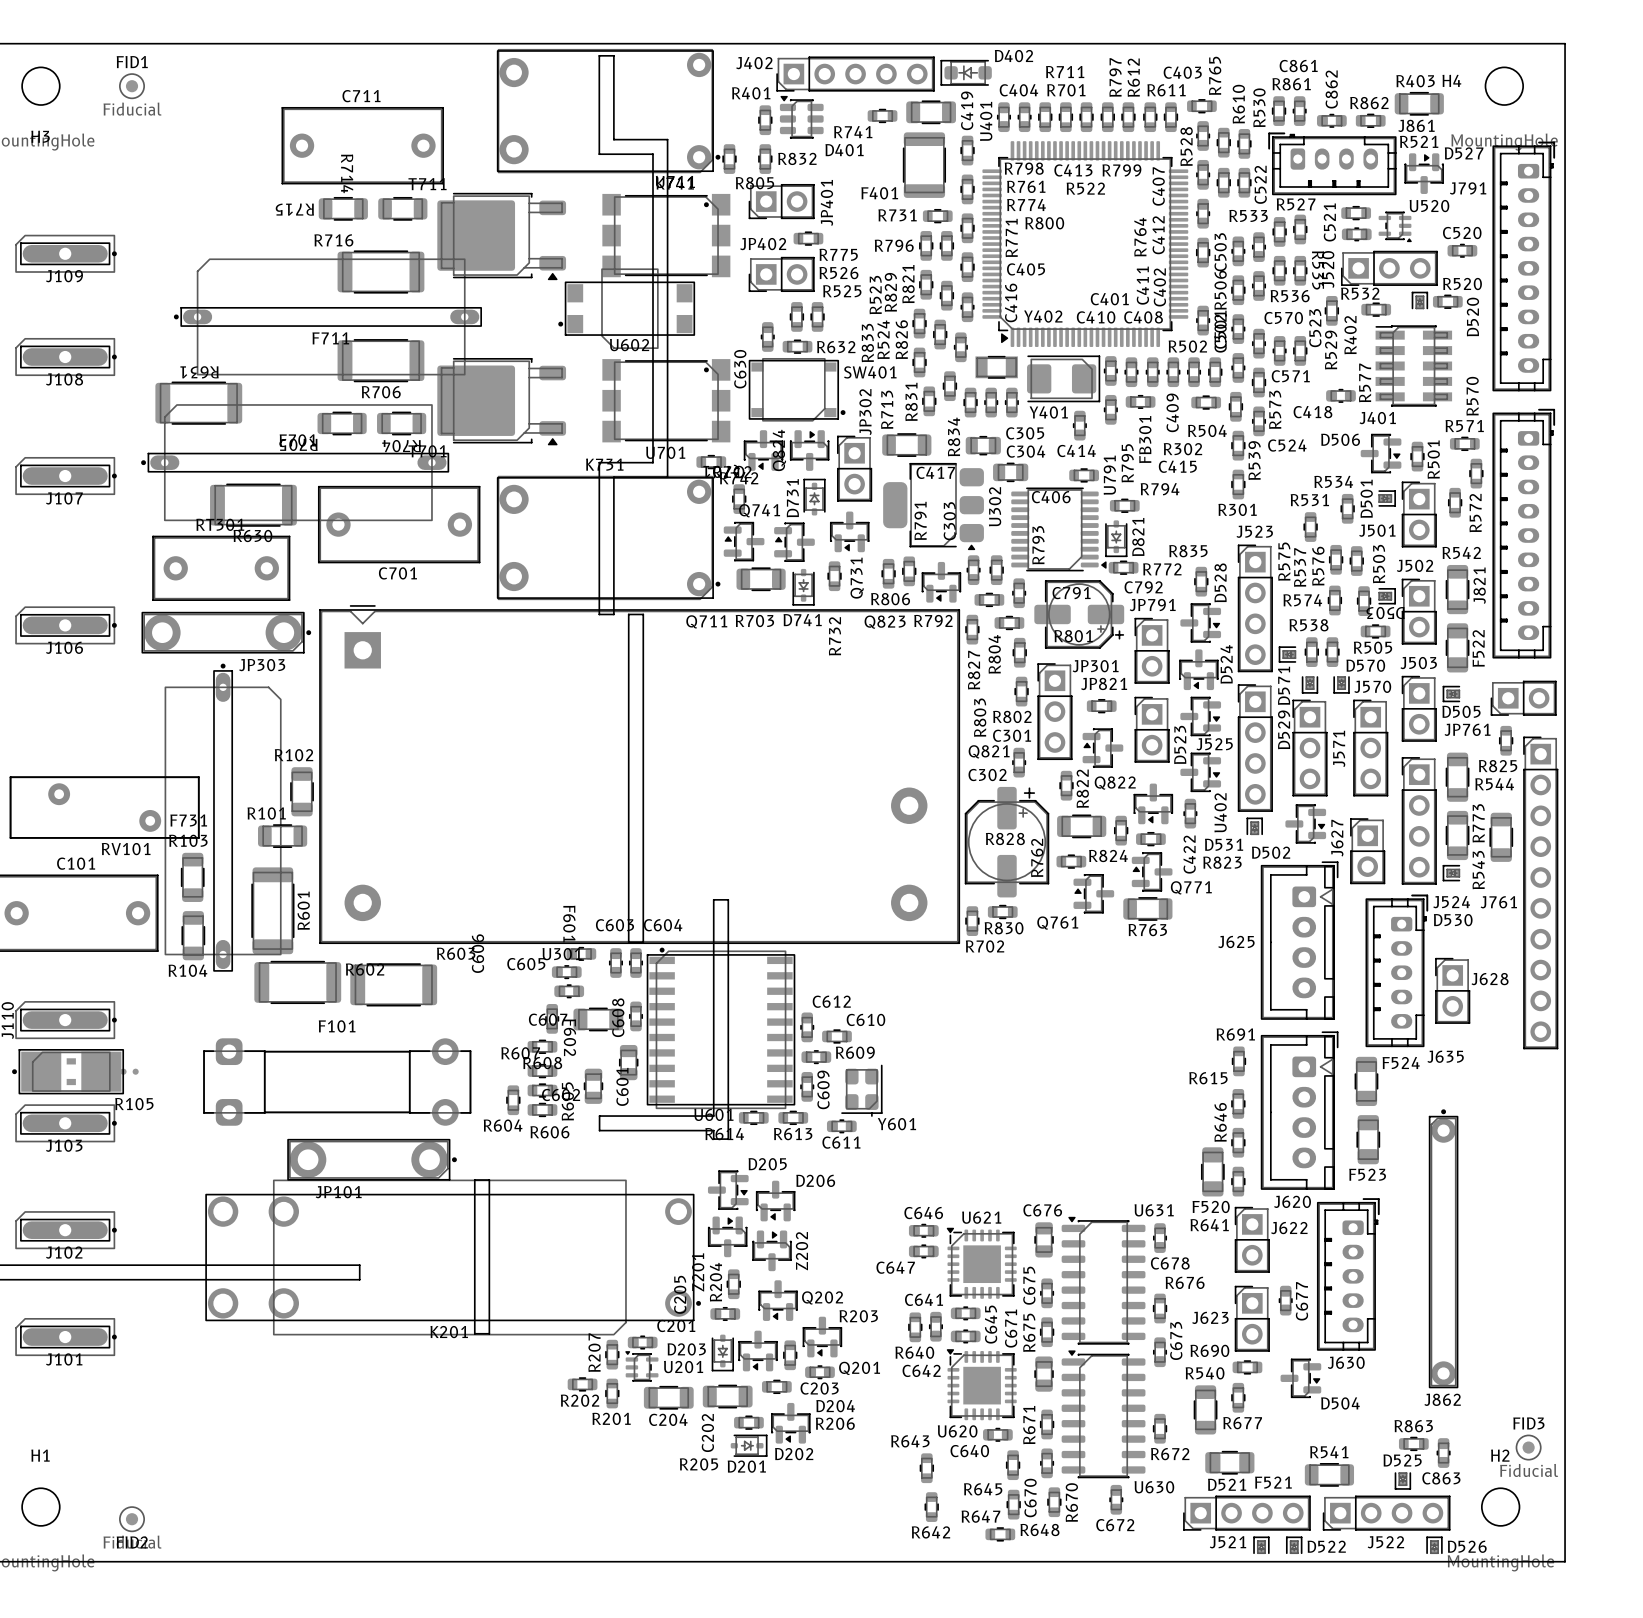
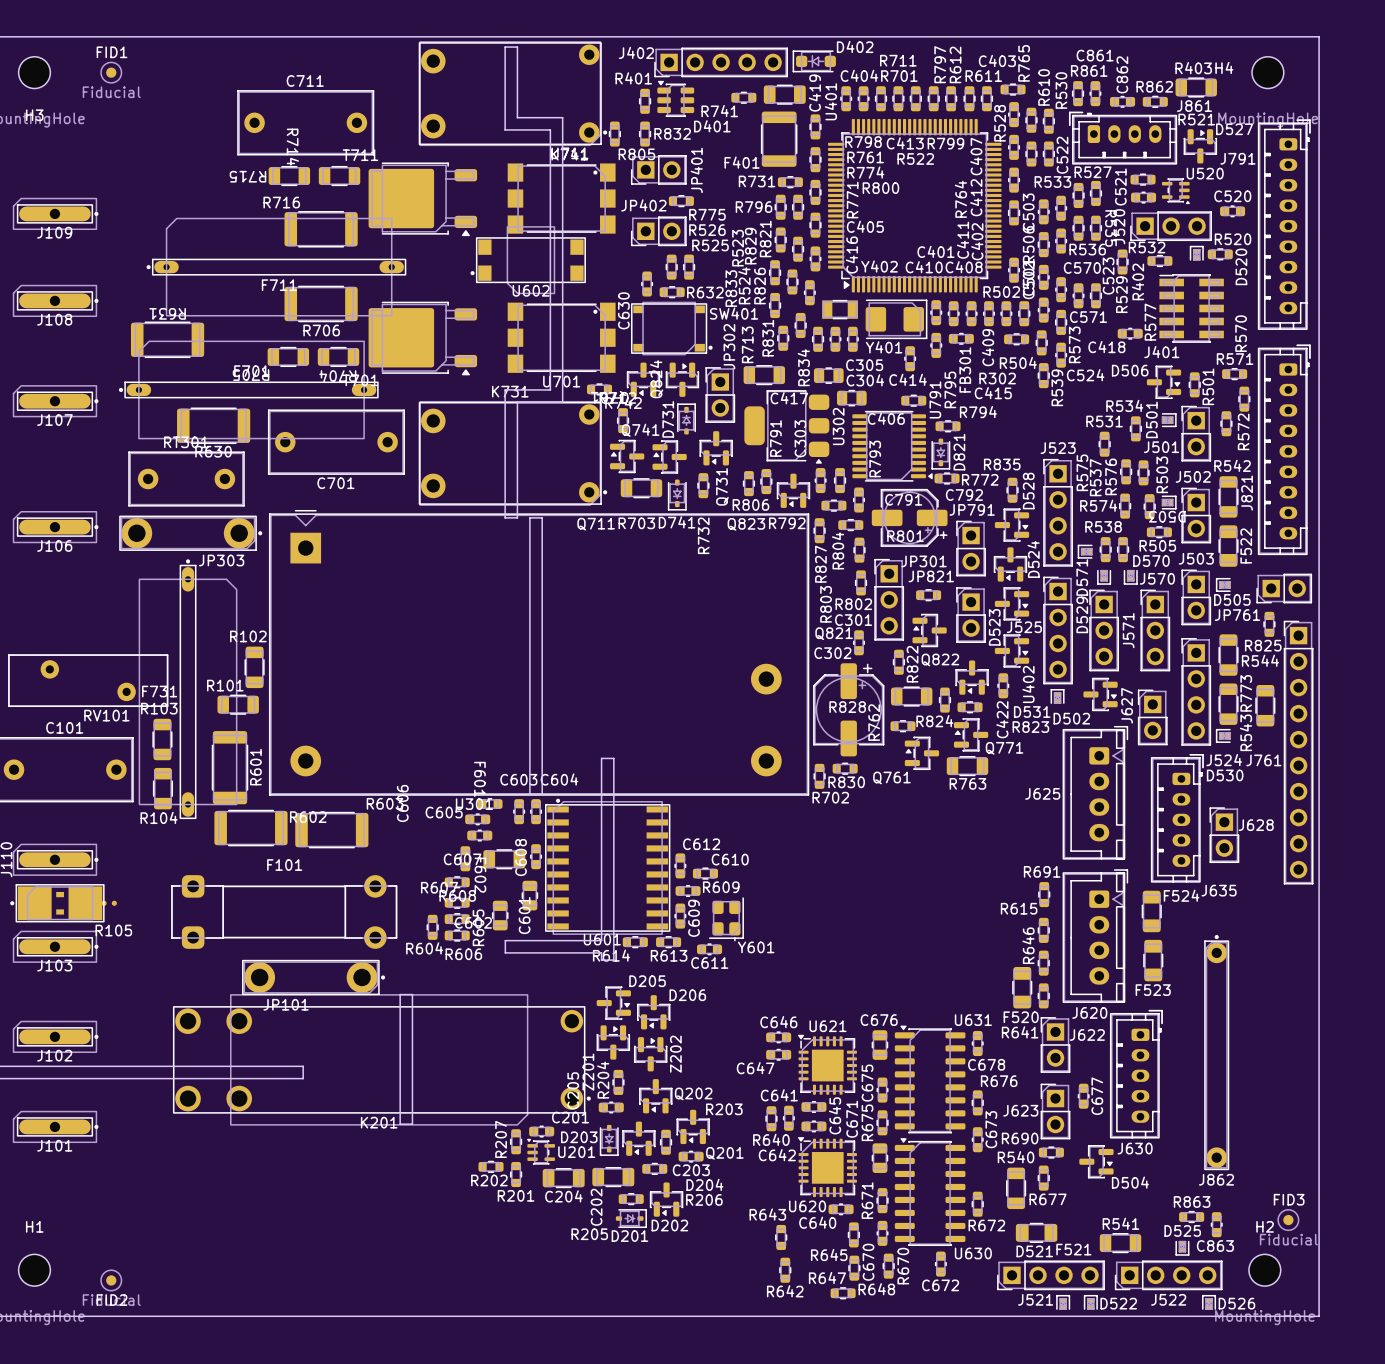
R301: (1238, 484) -> none

